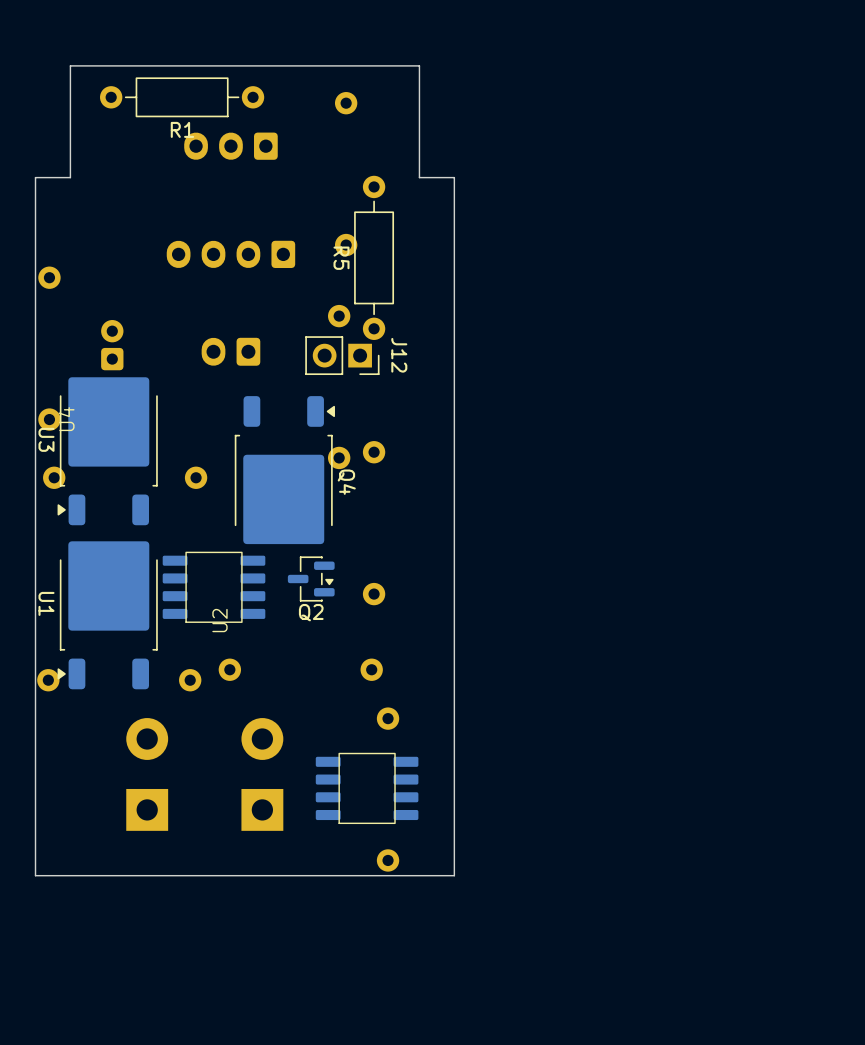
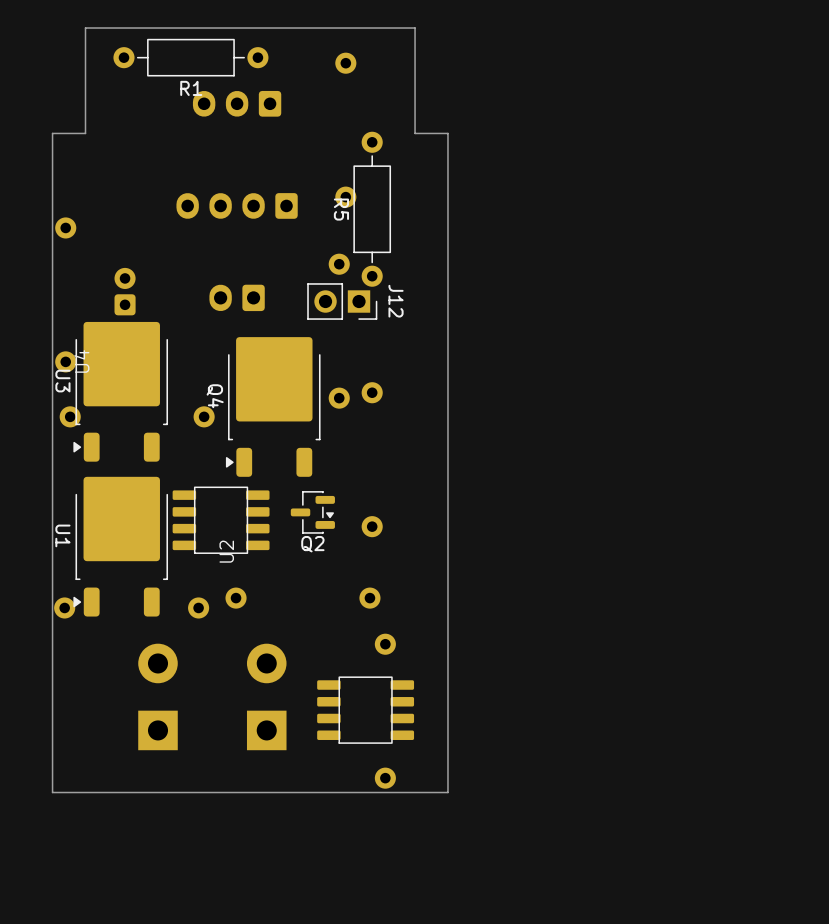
Q4 rotation: 0° (284, 470) -> 180° (273, 406)

